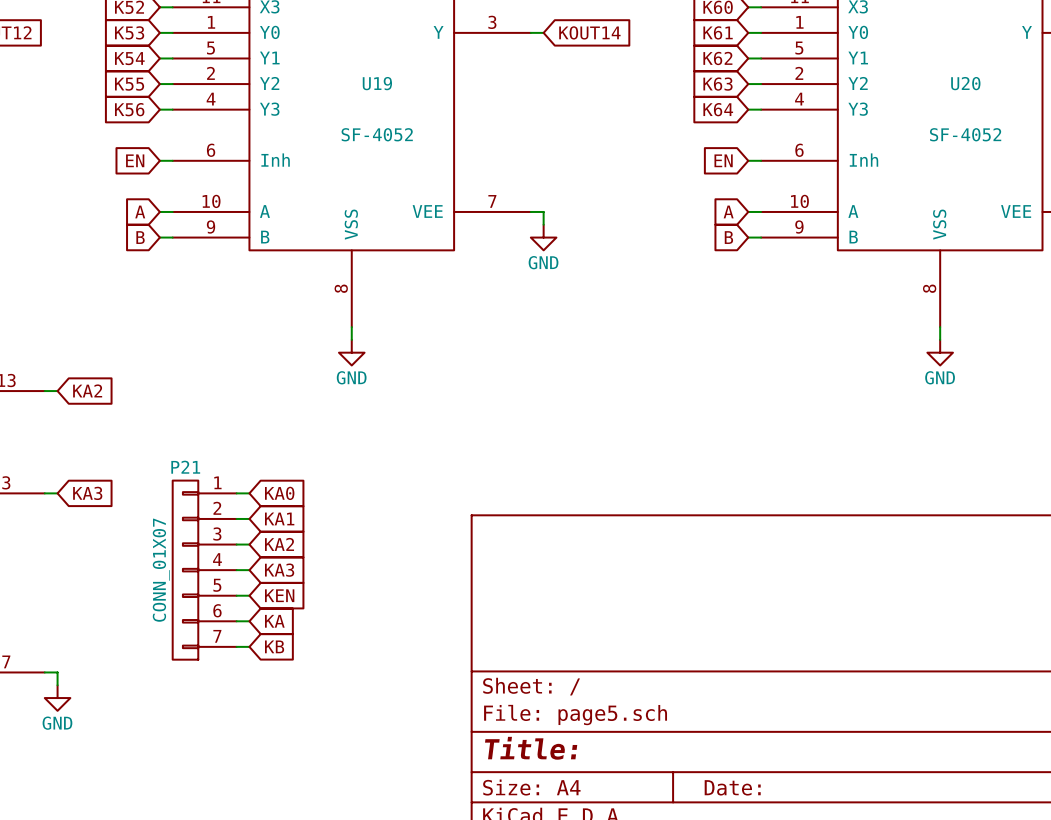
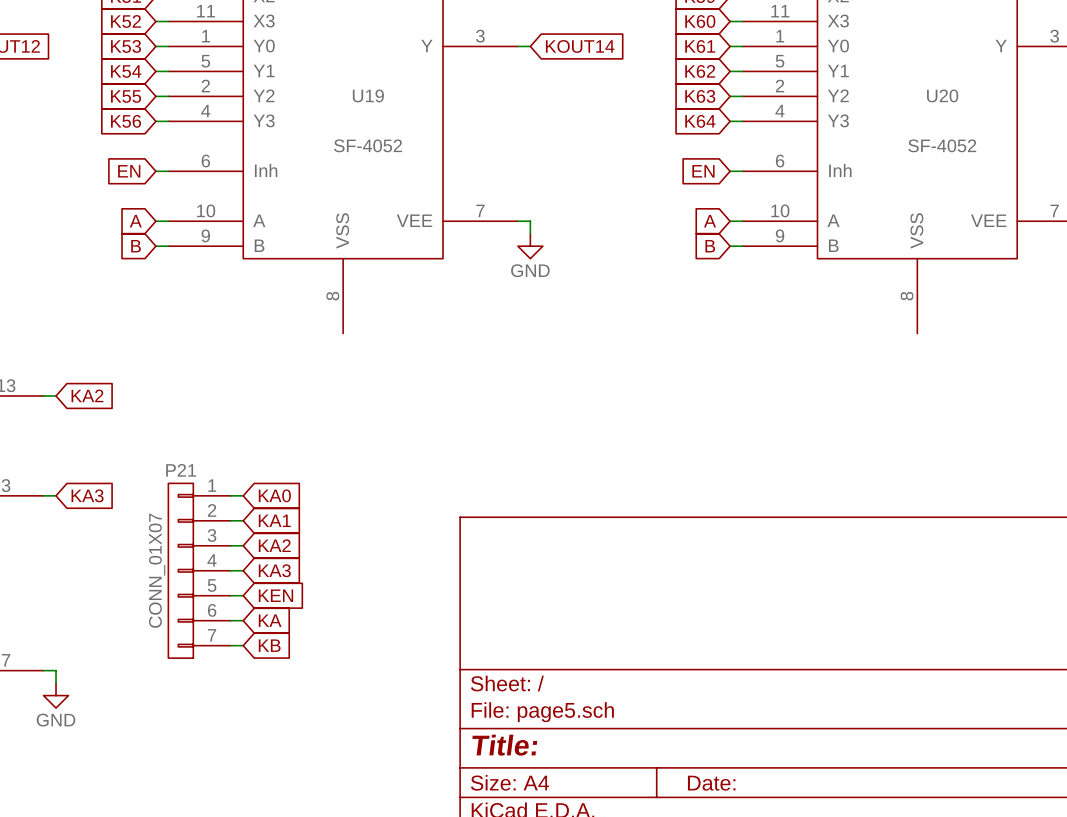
wire: (351, 327) (351, 339) -> none
wire: (940, 327) (940, 339) -> none
power symbol: GND (351, 352) -> none
power symbol: GND (940, 352) -> none

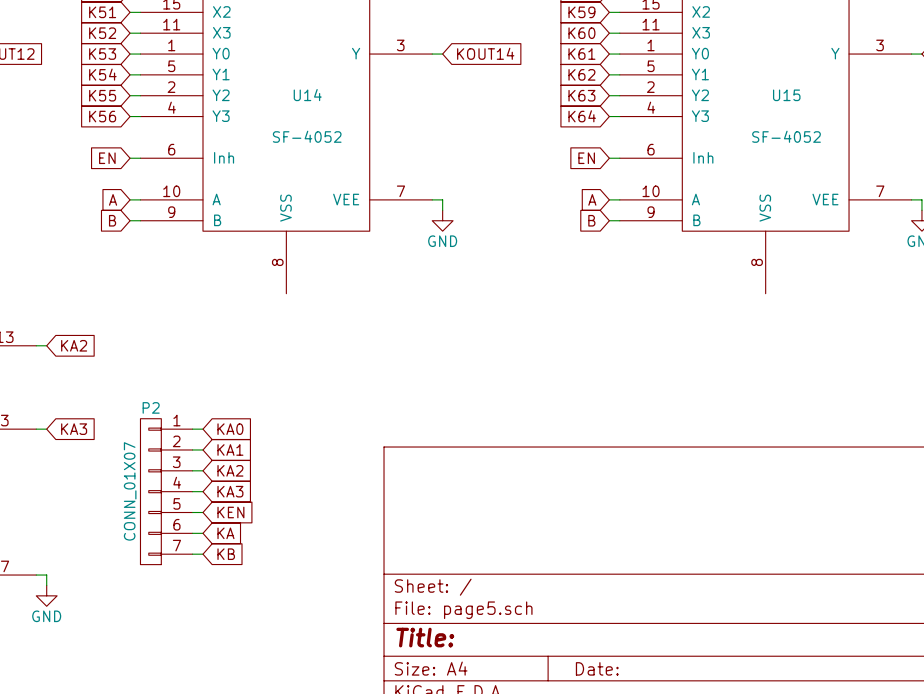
U19 name: U19 (368, 95) -> U14 (307, 95)
U20 name: U20 (942, 95) -> U15 (786, 95)
P21 name: P21 (181, 470) -> P2 (151, 407)

